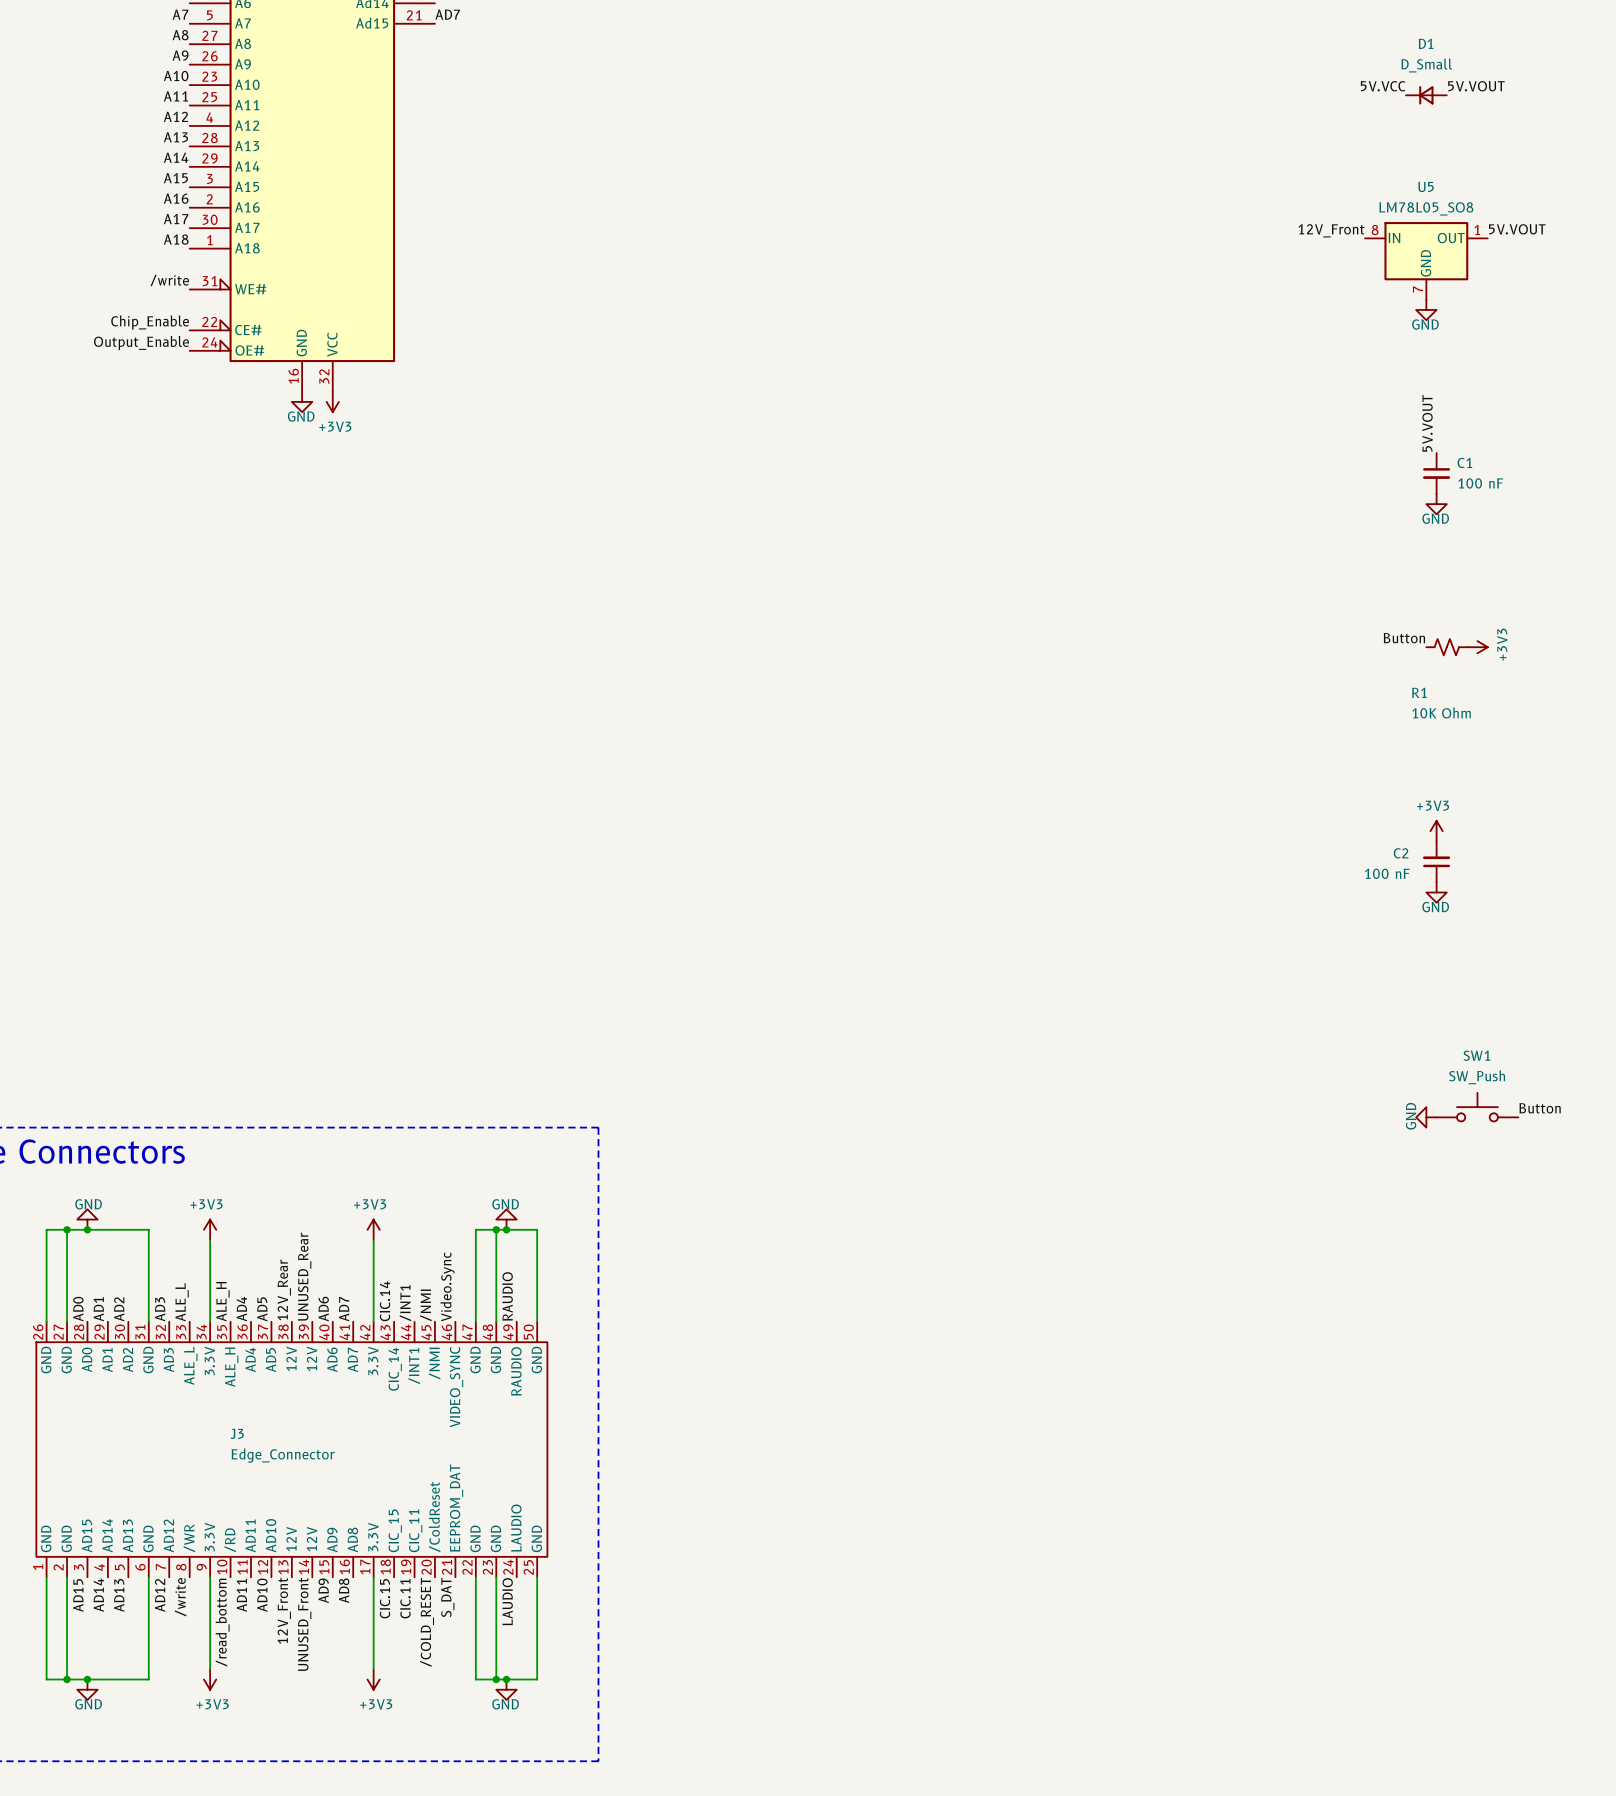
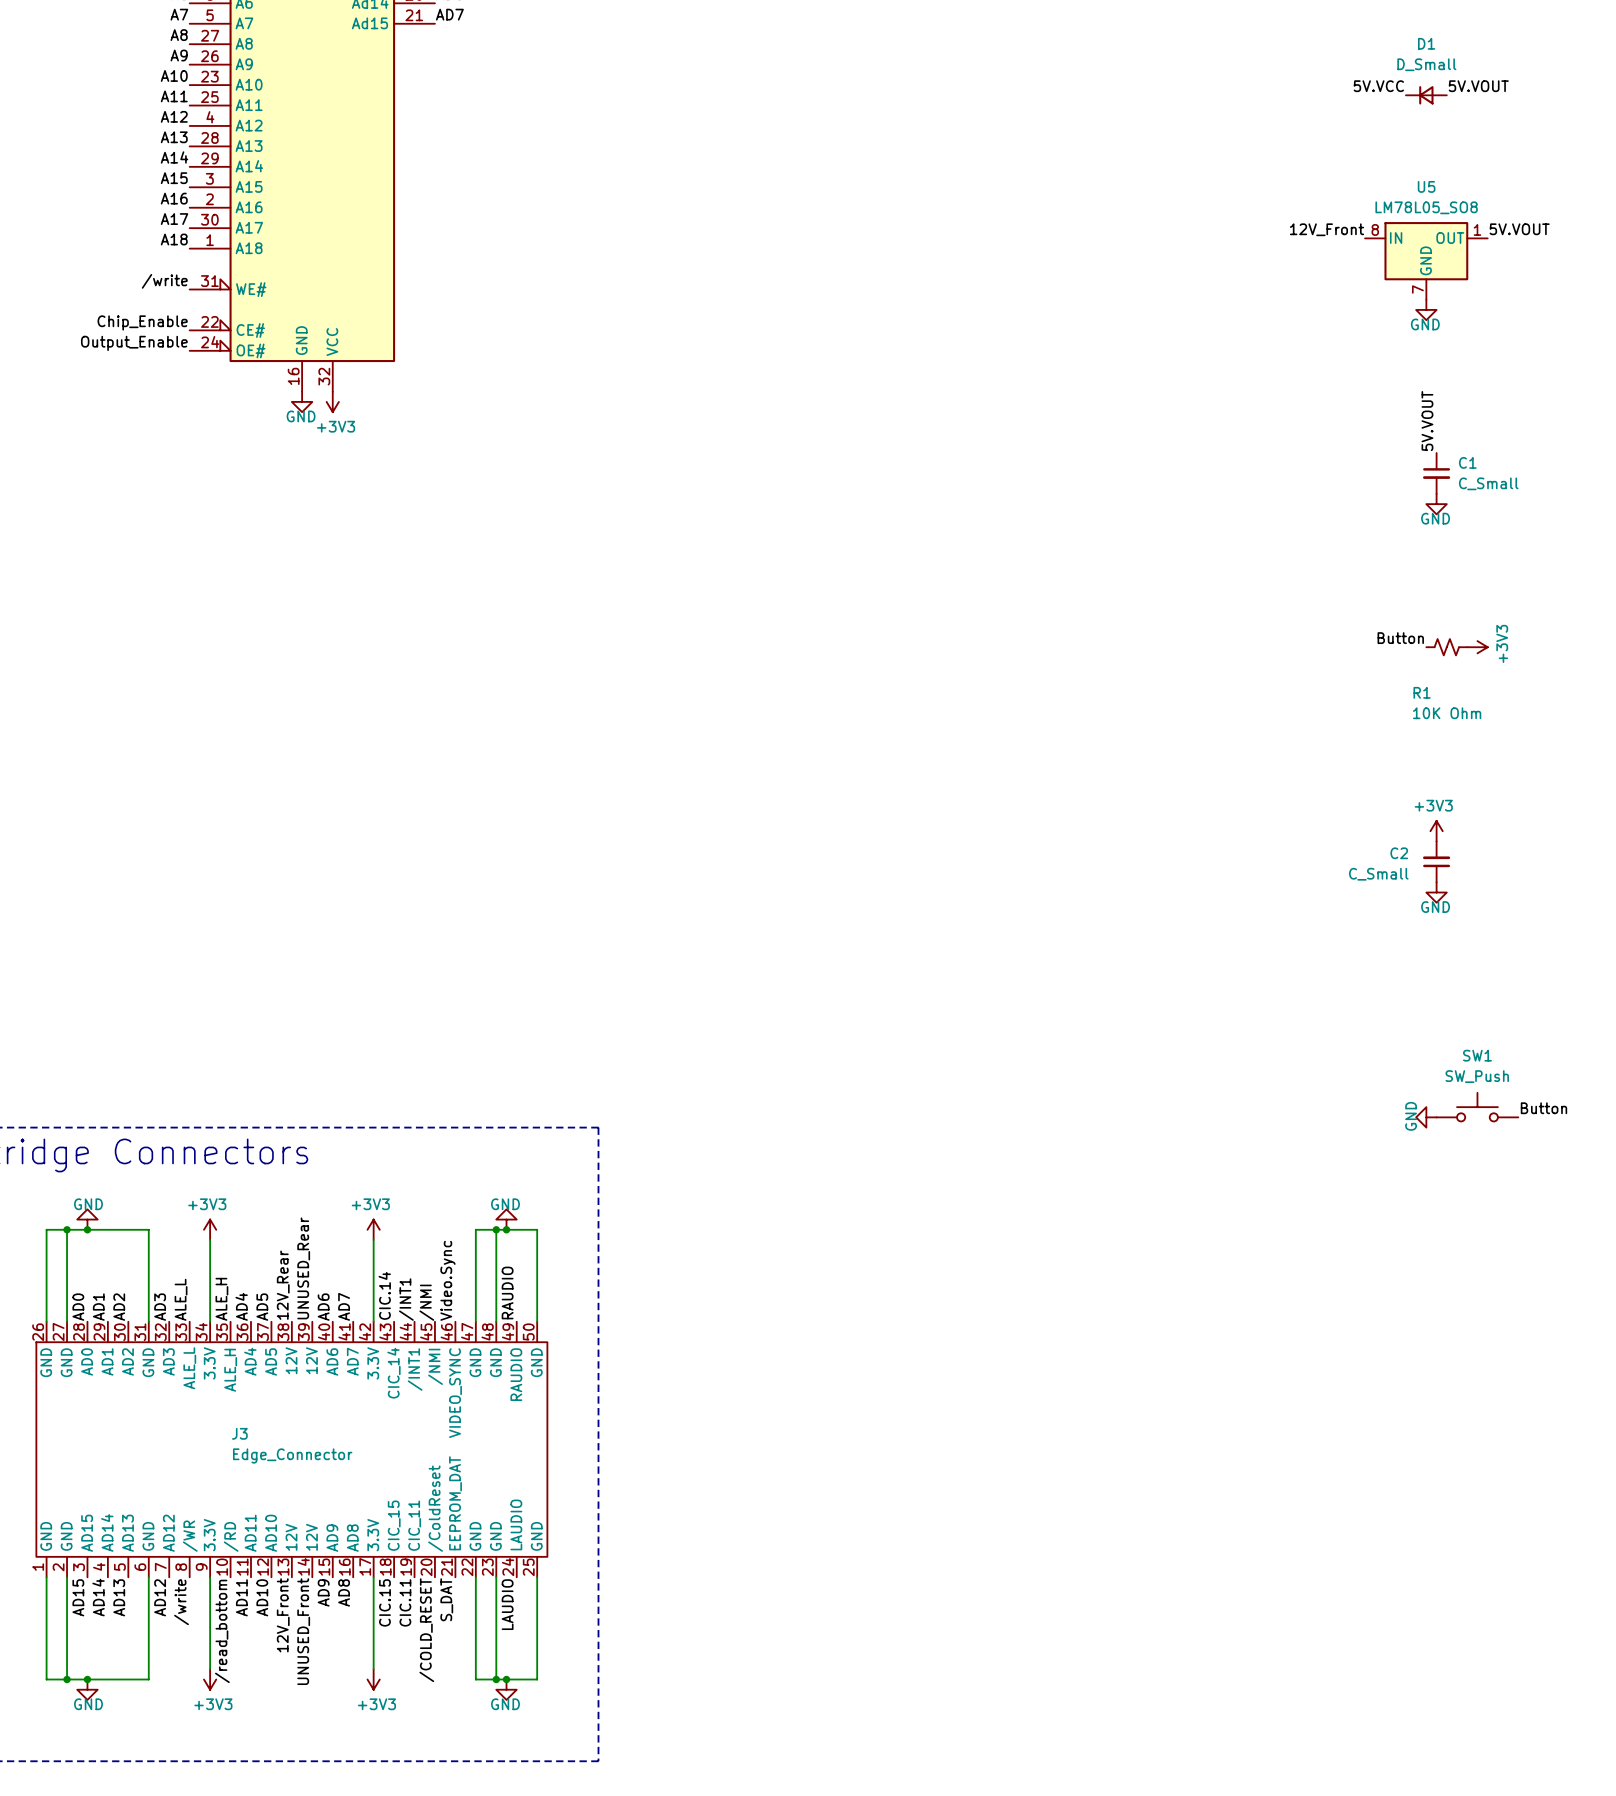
C1 value: 100 nF (1480, 483) -> C_Small (1488, 483)
C2 value: 100 nF (1387, 873) -> C_Small (1378, 874)

